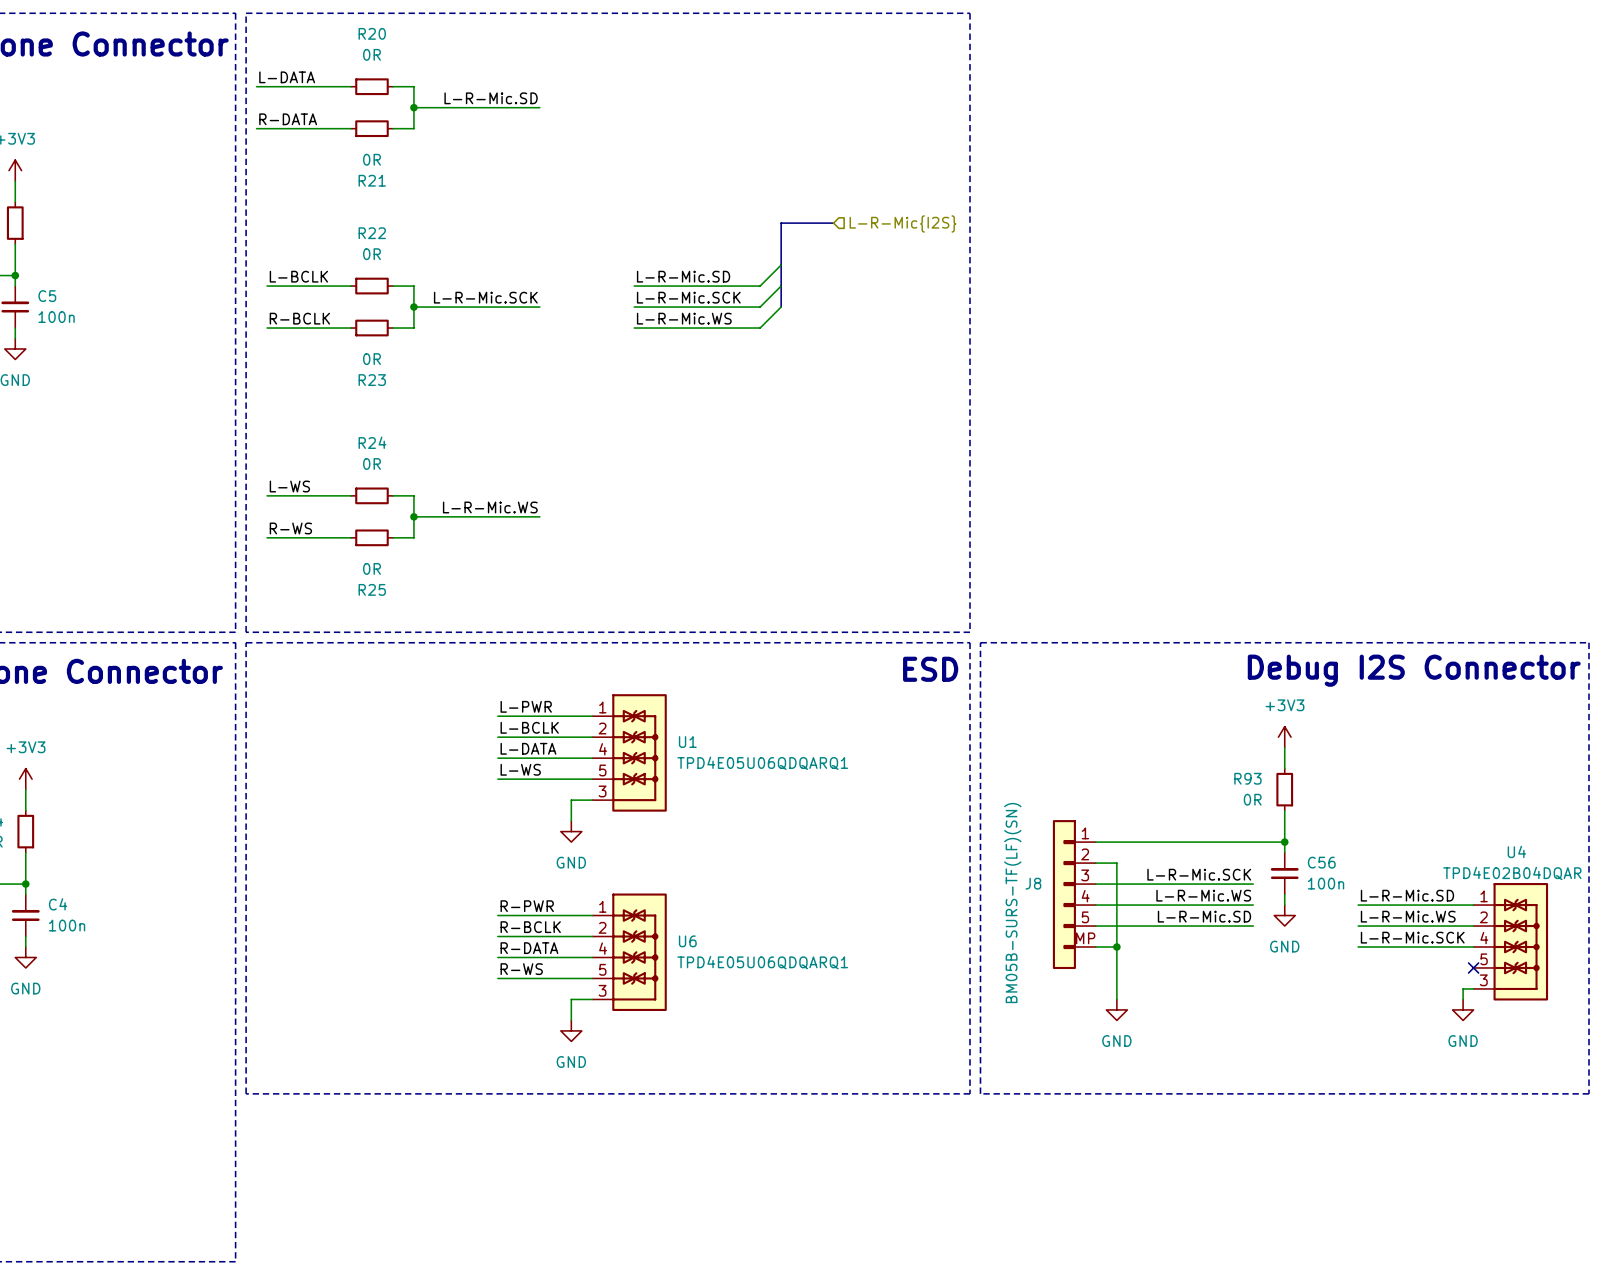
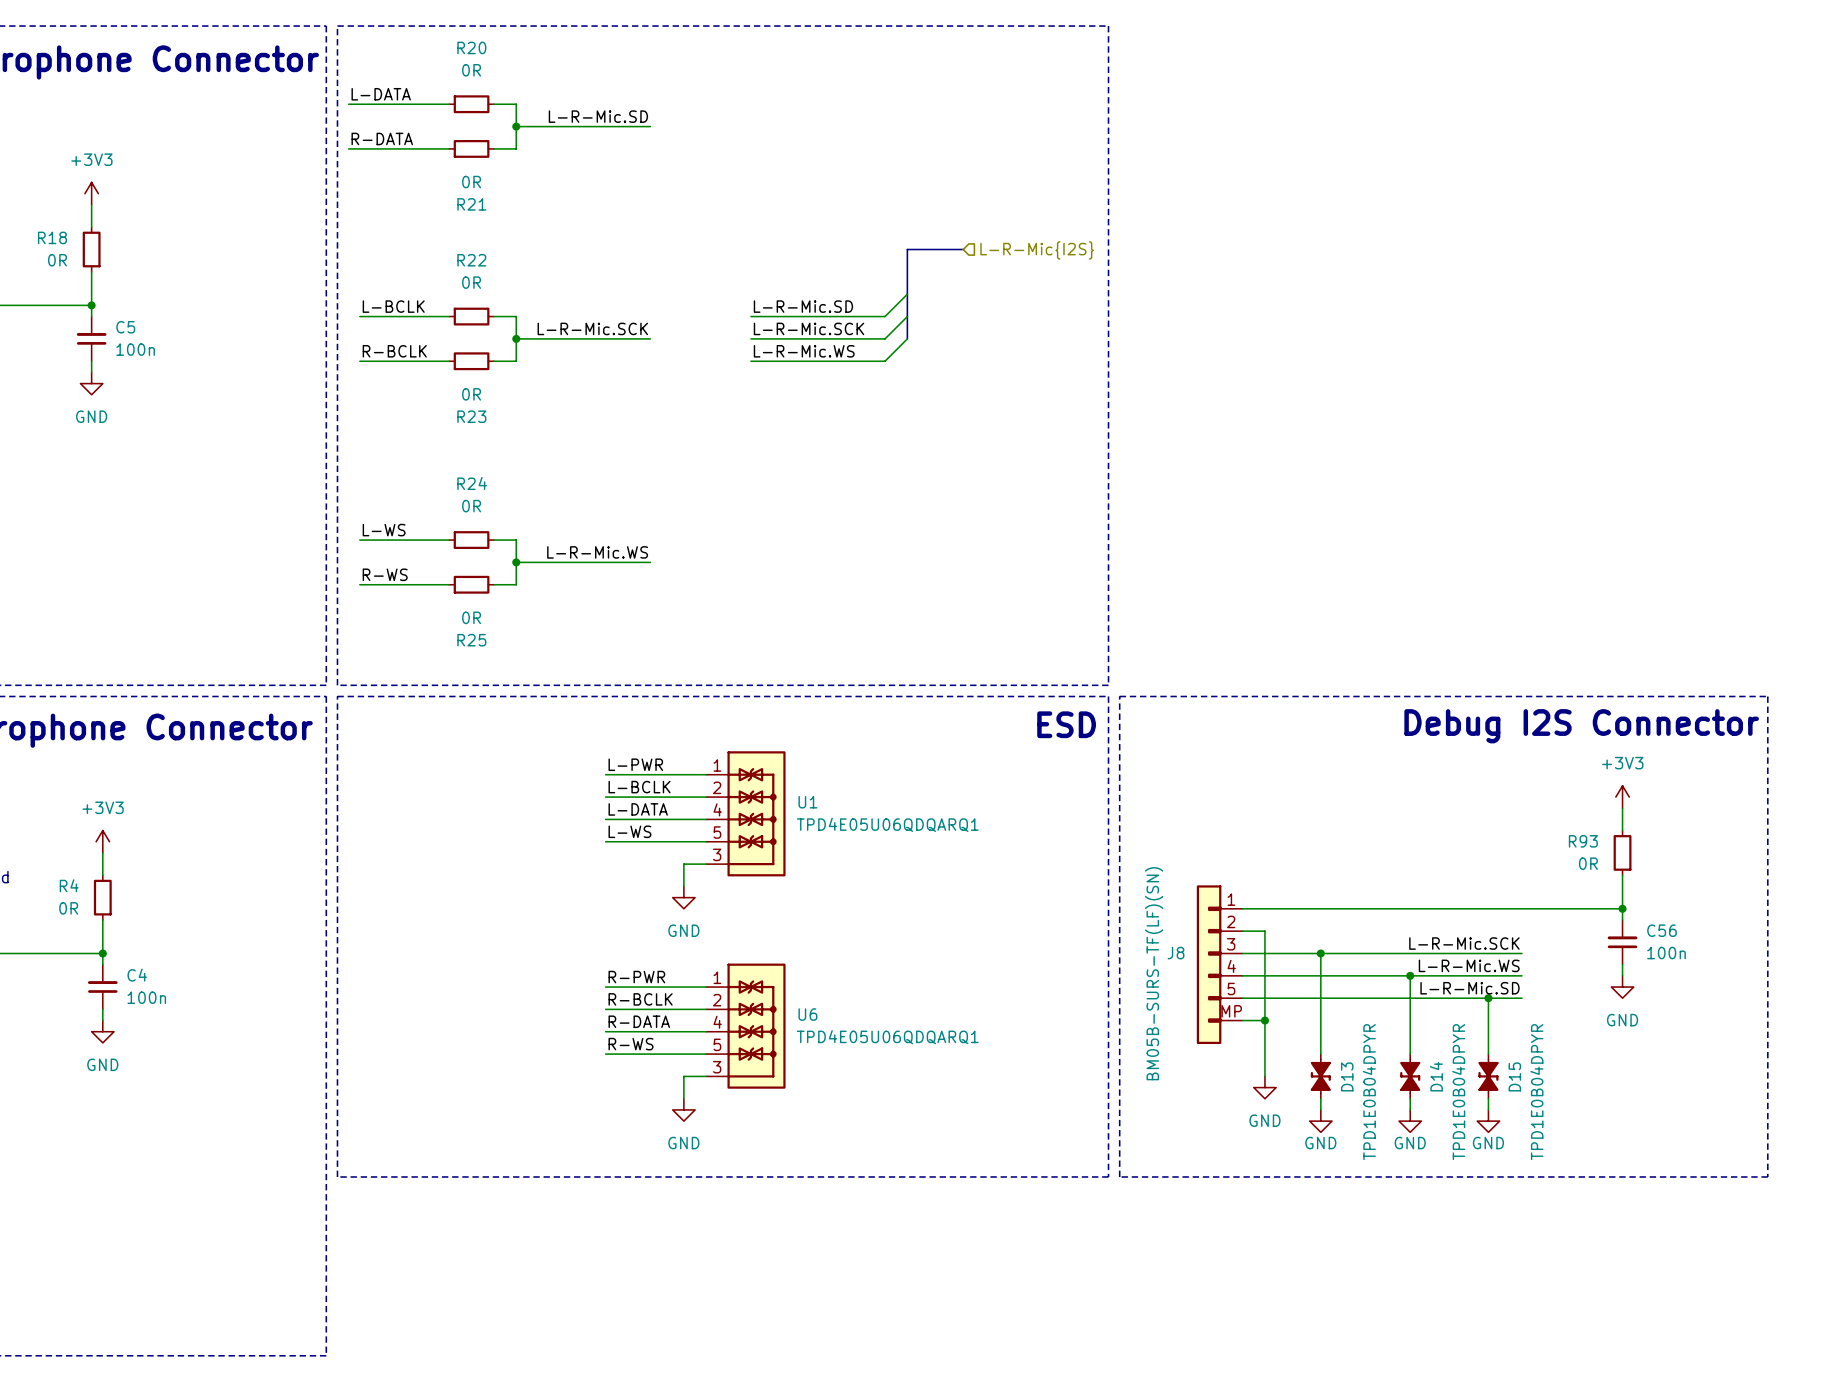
power symbol position: +3V3 (1284, 737) -> +3V3 (1622, 797)
wire: (1284, 747) (1284, 768) -> (1622, 808) (1622, 830)
R93 position: (1284, 789) -> (1622, 852)
wire: (1284, 810) (1284, 852) -> (1622, 875) (1622, 919)
wire: none -> (1443, 908) (1622, 908)
junction: (1284, 842) -> none
junction: none -> (1622, 908)
C56 position: (1284, 873) -> (1622, 942)
label: L-R-Mic.SCK (1199, 874) -> none
label: none -> L-R-Mic.SCK (1464, 943)
wire: none -> (1320, 953) (1320, 1054)
junction: none -> (1320, 953)
wire: none -> (1410, 953) (1521, 953)
wire: (1284, 894) (1284, 905) -> (1622, 964) (1622, 975)
label: L-R-Mic.WS (1203, 895) -> none
label: L-R-Mic.SD (1407, 895) -> L-R-Mic.WS (1469, 965)
junction: none -> (1410, 975)
wire: (1358, 905) (1473, 905) -> (1521, 975) (1410, 975) (1410, 1054)
power symbol: GND (1284, 915) -> none
power symbol: none -> GND (1622, 987)
label: L-R-Mic.SD (1204, 916) -> none
label: L-R-Mic.WS (1408, 916) -> L-R-Mic.SD (1470, 988)
wire: none -> (1488, 998) (1488, 1054)
junction: none -> (1488, 998)
wire: (1358, 926) (1473, 926) -> (1521, 998) (1410, 998)
label: L-R-Mic.SCK (1412, 937) -> none
U4: (1510, 941) -> none
wire: (1358, 947) (1473, 947) -> none
no-connect mark: (1473, 967) -> none
wire: (1473, 988) (1463, 988) (1463, 999) -> none
D13: none -> (1320, 1076)
D14: none -> (1410, 1076)
D15: none -> (1488, 1076)
power symbol: GND (1463, 1009) -> none
wire: none -> (1320, 1098) (1320, 1109)
wire: none -> (1410, 1098) (1410, 1109)
wire: none -> (1488, 1098) (1488, 1109)
power symbol: none -> GND (1320, 1121)
power symbol: none -> GND (1410, 1121)
power symbol: none -> GND (1488, 1121)

